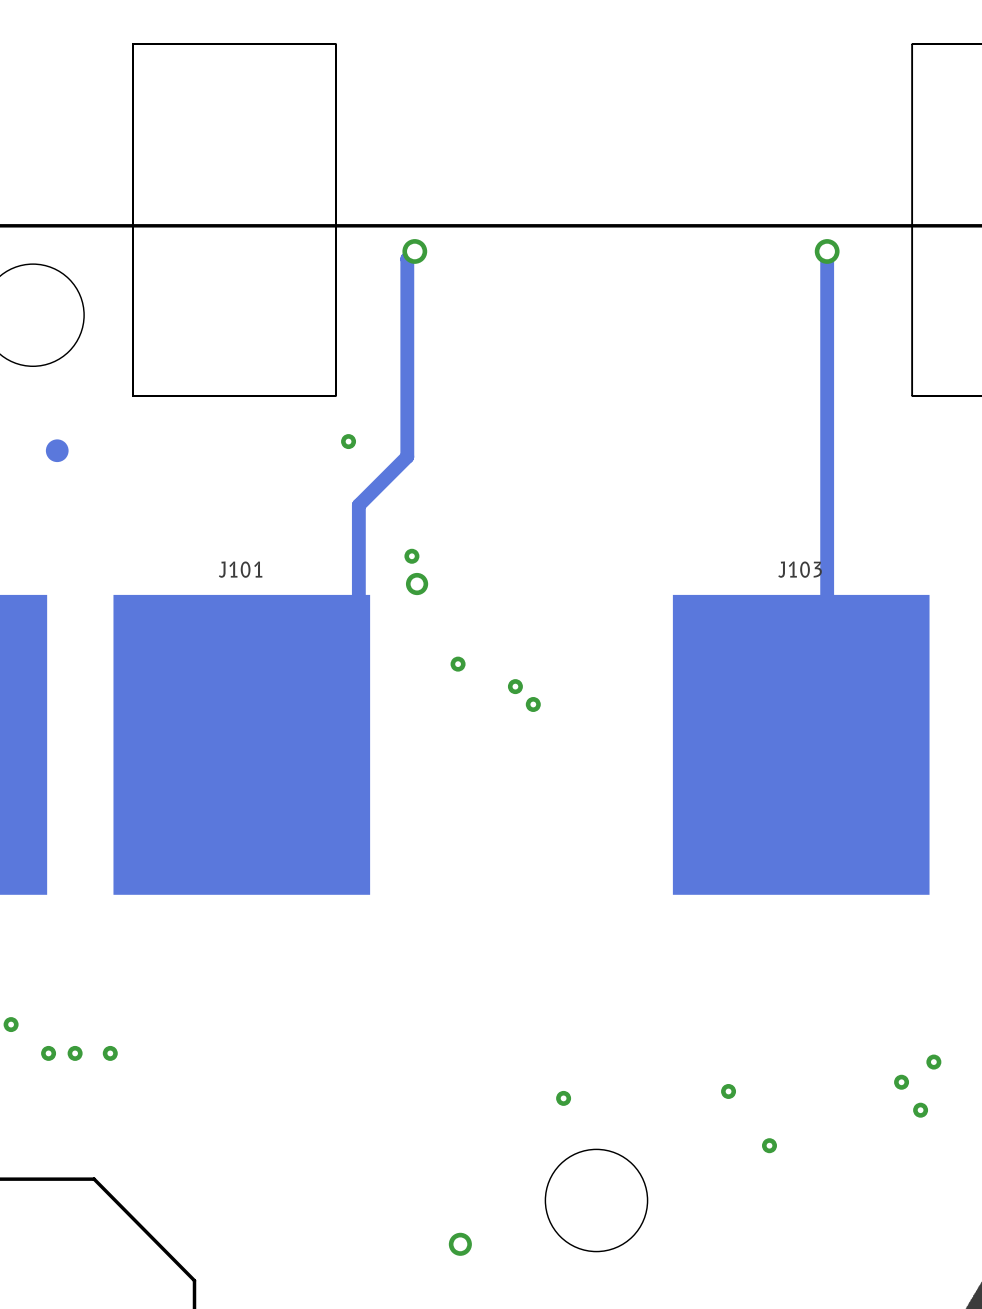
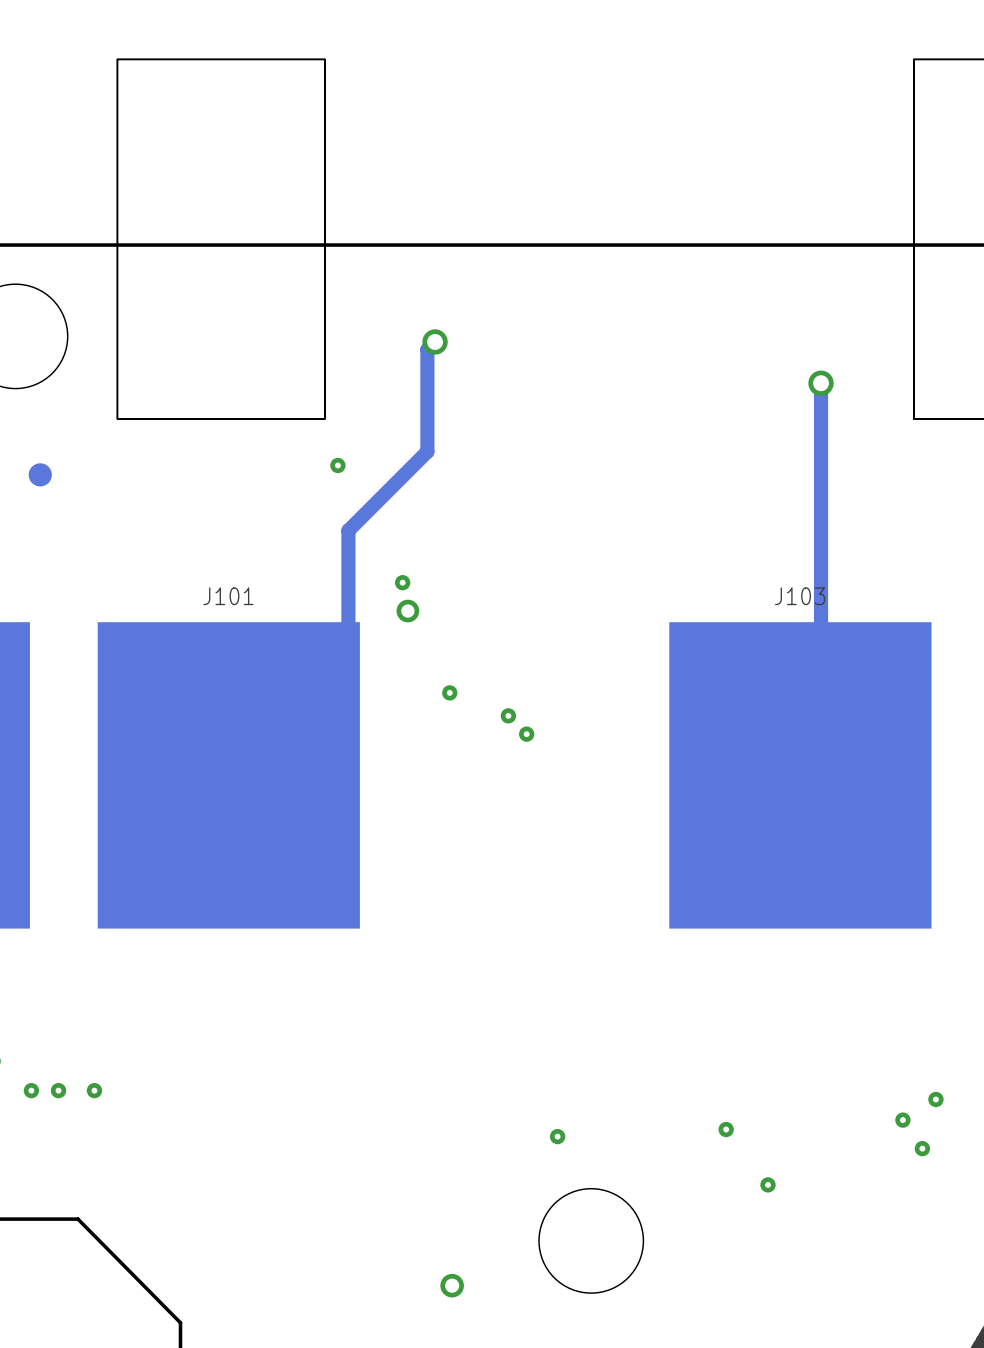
track: (414, 251) (407, 258) (407, 456) -> (435, 341) (427, 349) (427, 451) (397, 481)
via position: (414, 251) -> (435, 341)
track: (827, 251) (827, 718) (821, 724) -> (821, 383) (821, 754)
via position: (827, 251) -> (821, 383)

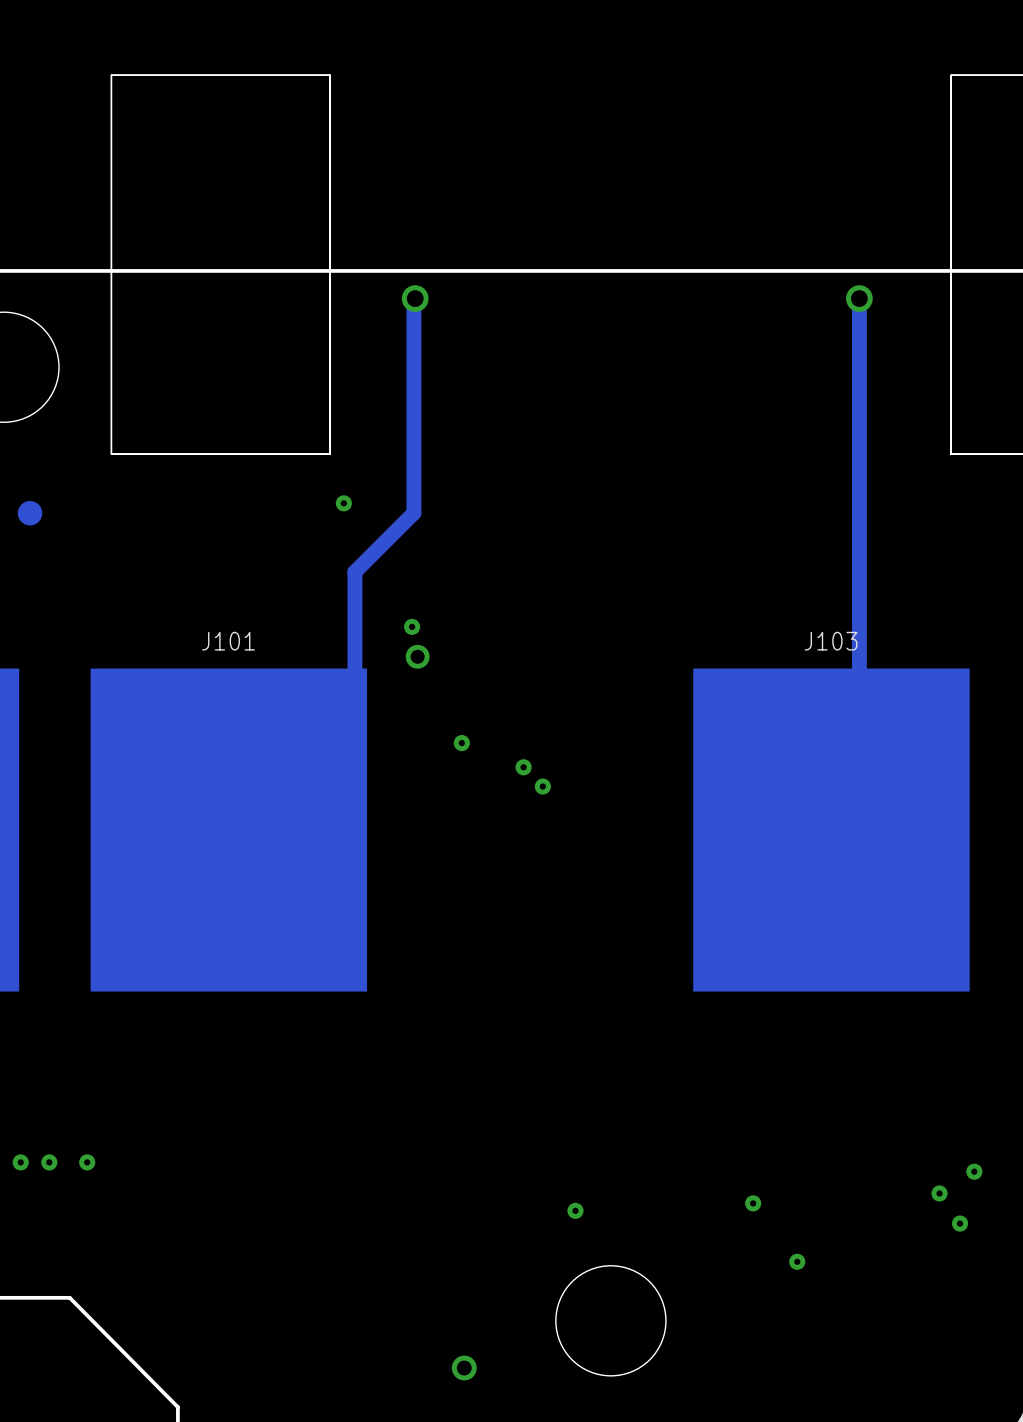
track: (435, 341) (427, 349) (427, 451) (404, 474) -> (415, 298) (413, 513)
via position: (435, 341) -> (415, 298)
track: (821, 383) (821, 754) -> (859, 298) (859, 802) (853, 808)
via position: (821, 383) -> (859, 298)

